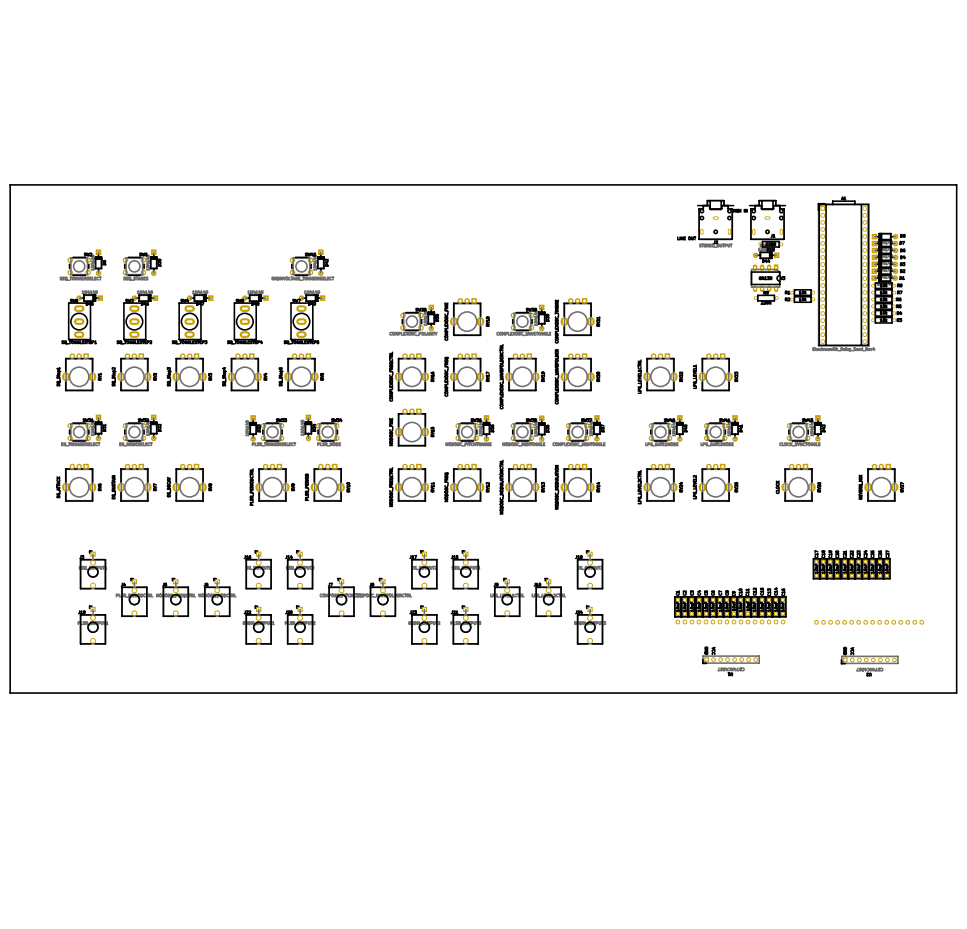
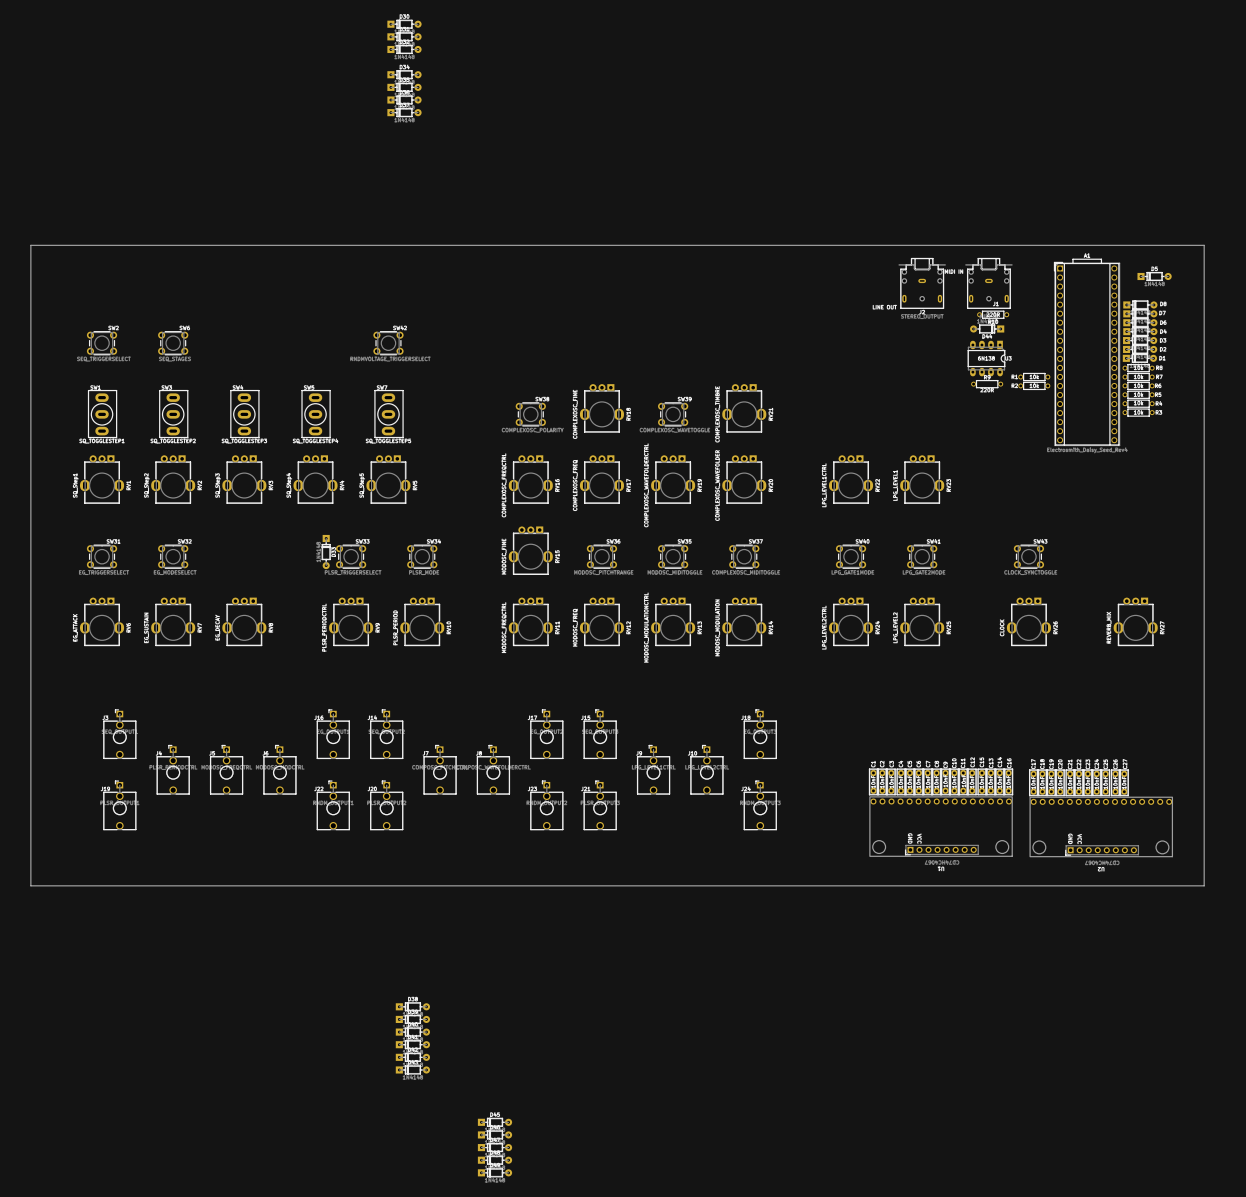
board edge: (10, 184) (956, 184) (956, 693) (10, 693) (10, 184) -> (30, 245) (30, 885) (1204, 885) (1204, 245) (30, 245)
part rotation: 0° (98, 262) -> 90° counterclockwise (1154, 276)
part position: (98, 262) -> (1154, 276)
part rotation: 0° (153, 262) -> 90° counterclockwise (404, 24)
part position: (153, 262) -> (404, 24)
part rotation: 0° (320, 262) -> 90° counterclockwise (412, 1057)
part position: (320, 262) -> (412, 1057)
part rotation: 0° (89, 298) -> 180° (495, 1122)
part position: (89, 298) -> (495, 1122)
part rotation: 0° (144, 298) -> 180° (495, 1134)
part position: (144, 298) -> (495, 1134)
part rotation: 0° (200, 298) -> 180° (495, 1147)
part position: (200, 298) -> (495, 1147)
part rotation: 0° (255, 298) -> 180° (495, 1160)
part position: (255, 298) -> (495, 1160)
part rotation: 0° (312, 298) -> 180° (495, 1172)
part position: (312, 298) -> (495, 1172)
part rotation: 0° (431, 317) -> 90° counterclockwise (412, 1006)
part position: (431, 317) -> (412, 1006)
part rotation: 0° (541, 317) -> 90° counterclockwise (412, 1019)
part position: (541, 317) -> (412, 1019)
part rotation: 0° (98, 427) -> 90° counterclockwise (404, 36)
part position: (98, 427) -> (404, 36)
part rotation: 0° (153, 427) -> 90° counterclockwise (404, 49)
part position: (153, 427) -> (404, 49)
part rotation: 0° (308, 427) -> 90° counterclockwise (404, 74)
part position: (308, 427) -> (404, 74)
part rotation: 0° (486, 428) -> 90° counterclockwise (404, 100)
part position: (486, 428) -> (404, 100)
part rotation: 0° (541, 428) -> 90° counterclockwise (404, 87)
part position: (541, 428) -> (404, 87)
part rotation: 0° (596, 428) -> 90° counterclockwise (404, 112)
part position: (596, 428) -> (404, 112)
part rotation: 0° (679, 428) -> 90° counterclockwise (412, 1032)
part position: (679, 428) -> (412, 1032)
part rotation: 0° (735, 428) -> 90° counterclockwise (412, 1044)
part position: (735, 428) -> (412, 1044)
part rotation: 0° (817, 428) -> 90° counterclockwise (412, 1069)
part position: (817, 428) -> (412, 1069)
part position: (816, 568) -> (1033, 782)
part position: (823, 568) -> (1042, 782)
part position: (830, 568) -> (1051, 782)
part position: (837, 568) -> (1060, 782)
part position: (844, 568) -> (1070, 782)
part position: (851, 568) -> (1078, 782)
part position: (858, 568) -> (1087, 782)
part position: (865, 568) -> (1096, 782)
part position: (872, 568) -> (1105, 782)
part position: (880, 568) -> (1115, 782)
part position: (886, 568) -> (1124, 782)
part footprint: [675, 619, 786, 664] -> [869, 796, 1013, 857]
part footprint: [814, 619, 925, 664] -> [1029, 797, 1173, 857]

